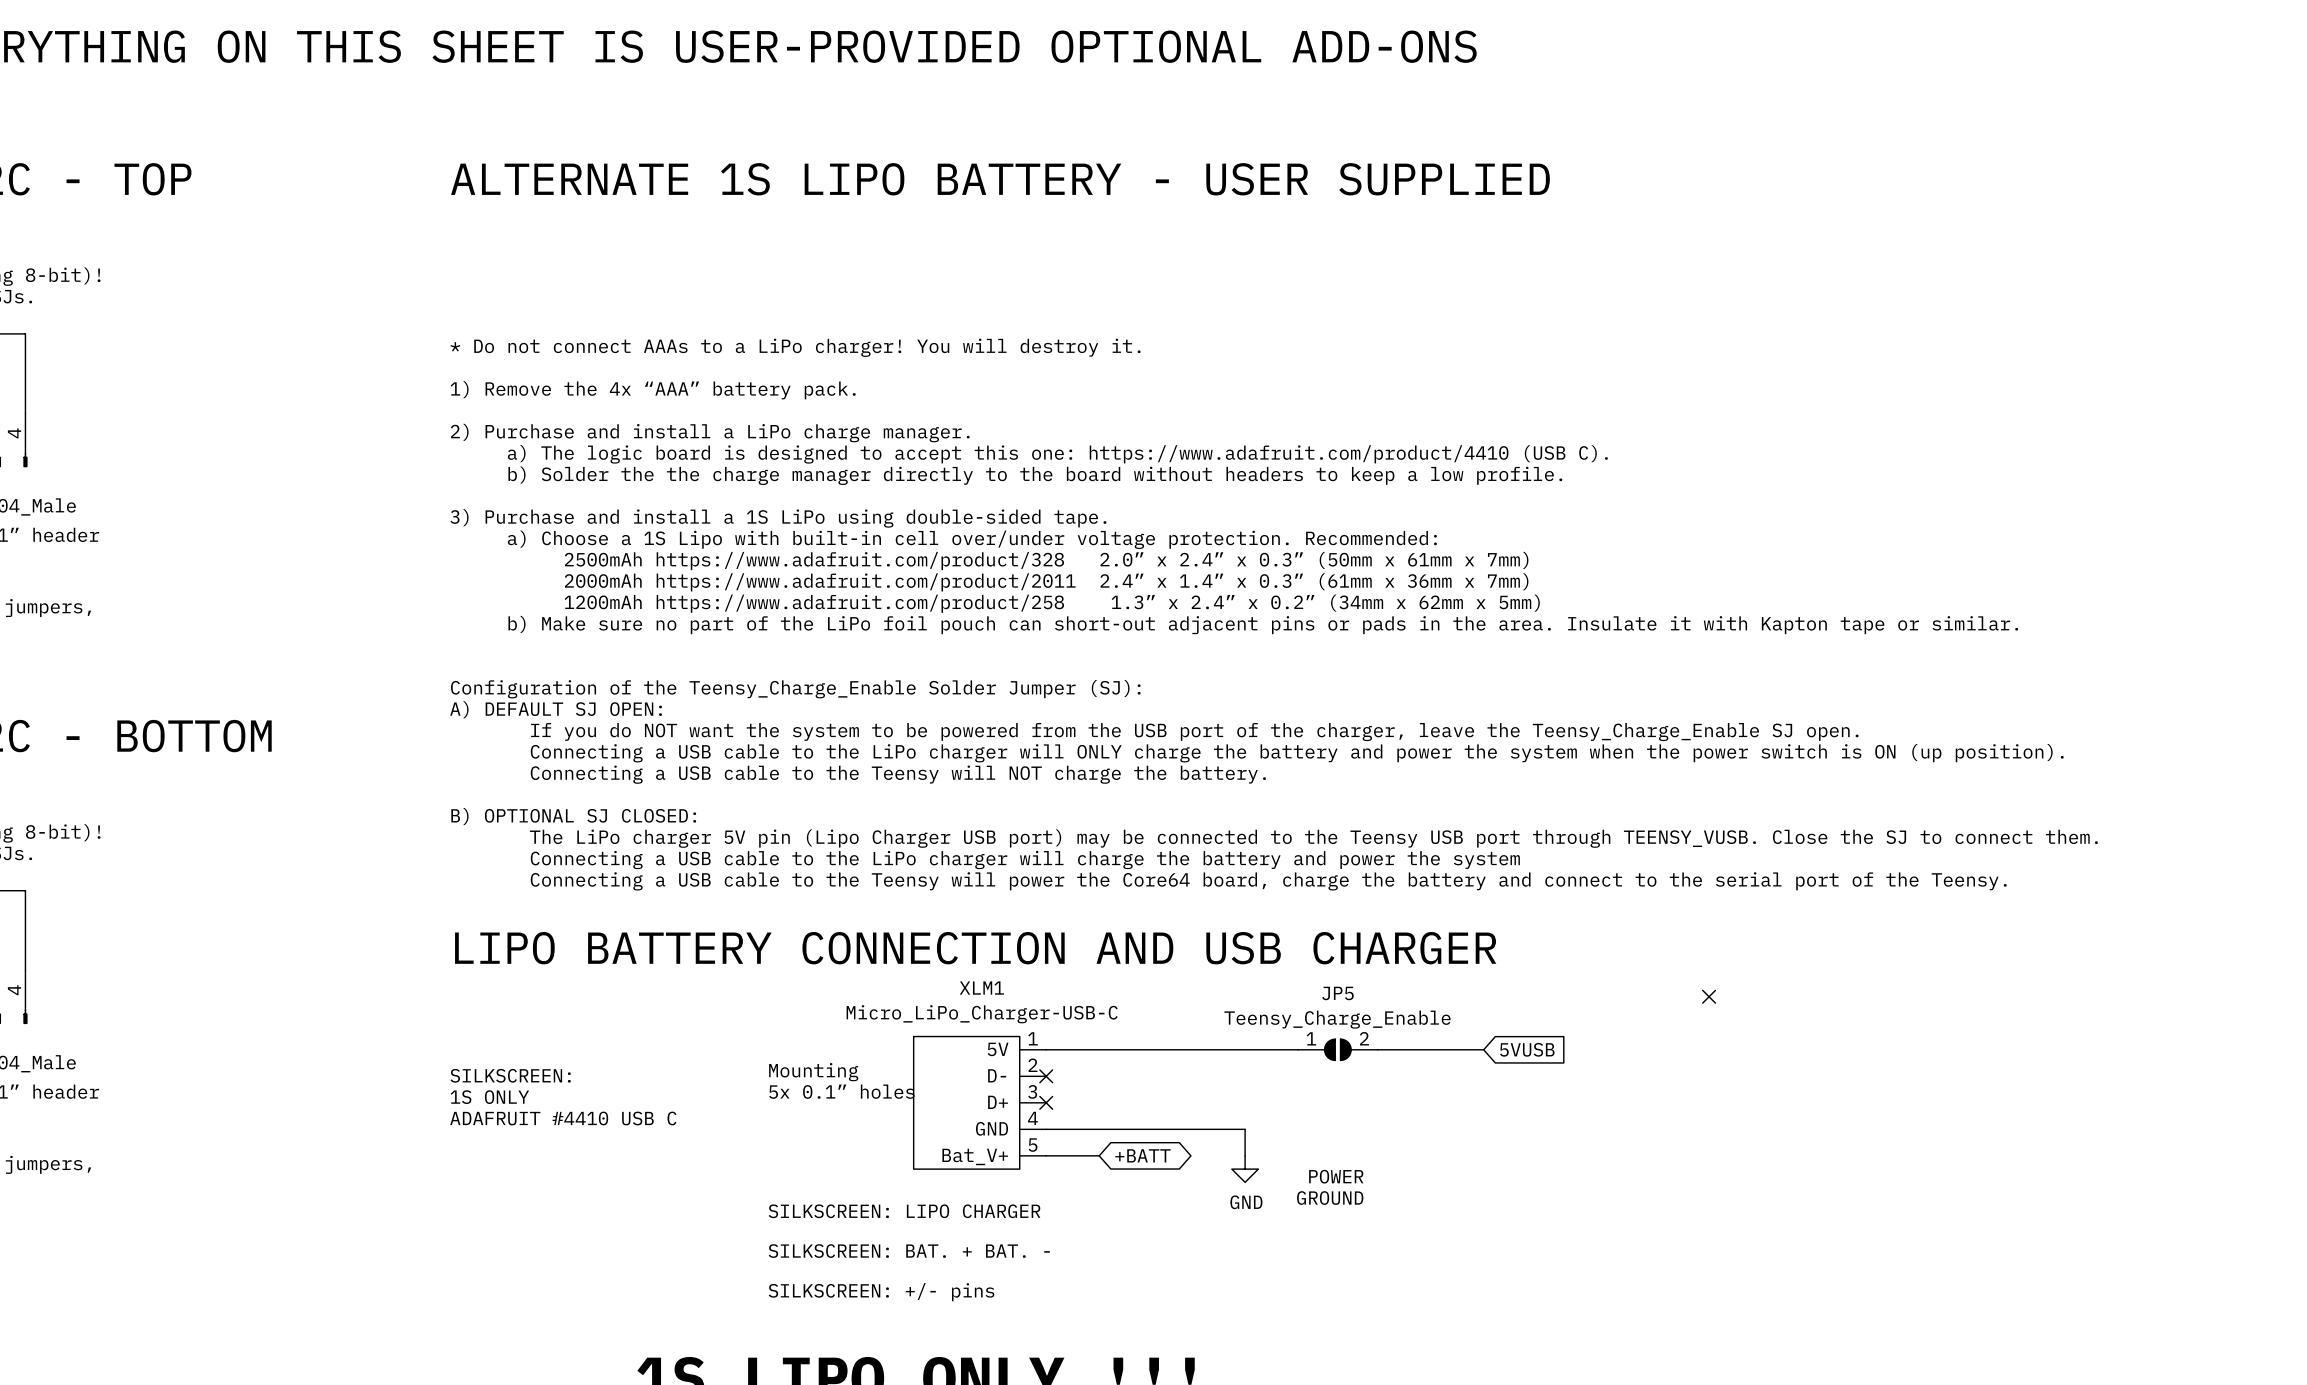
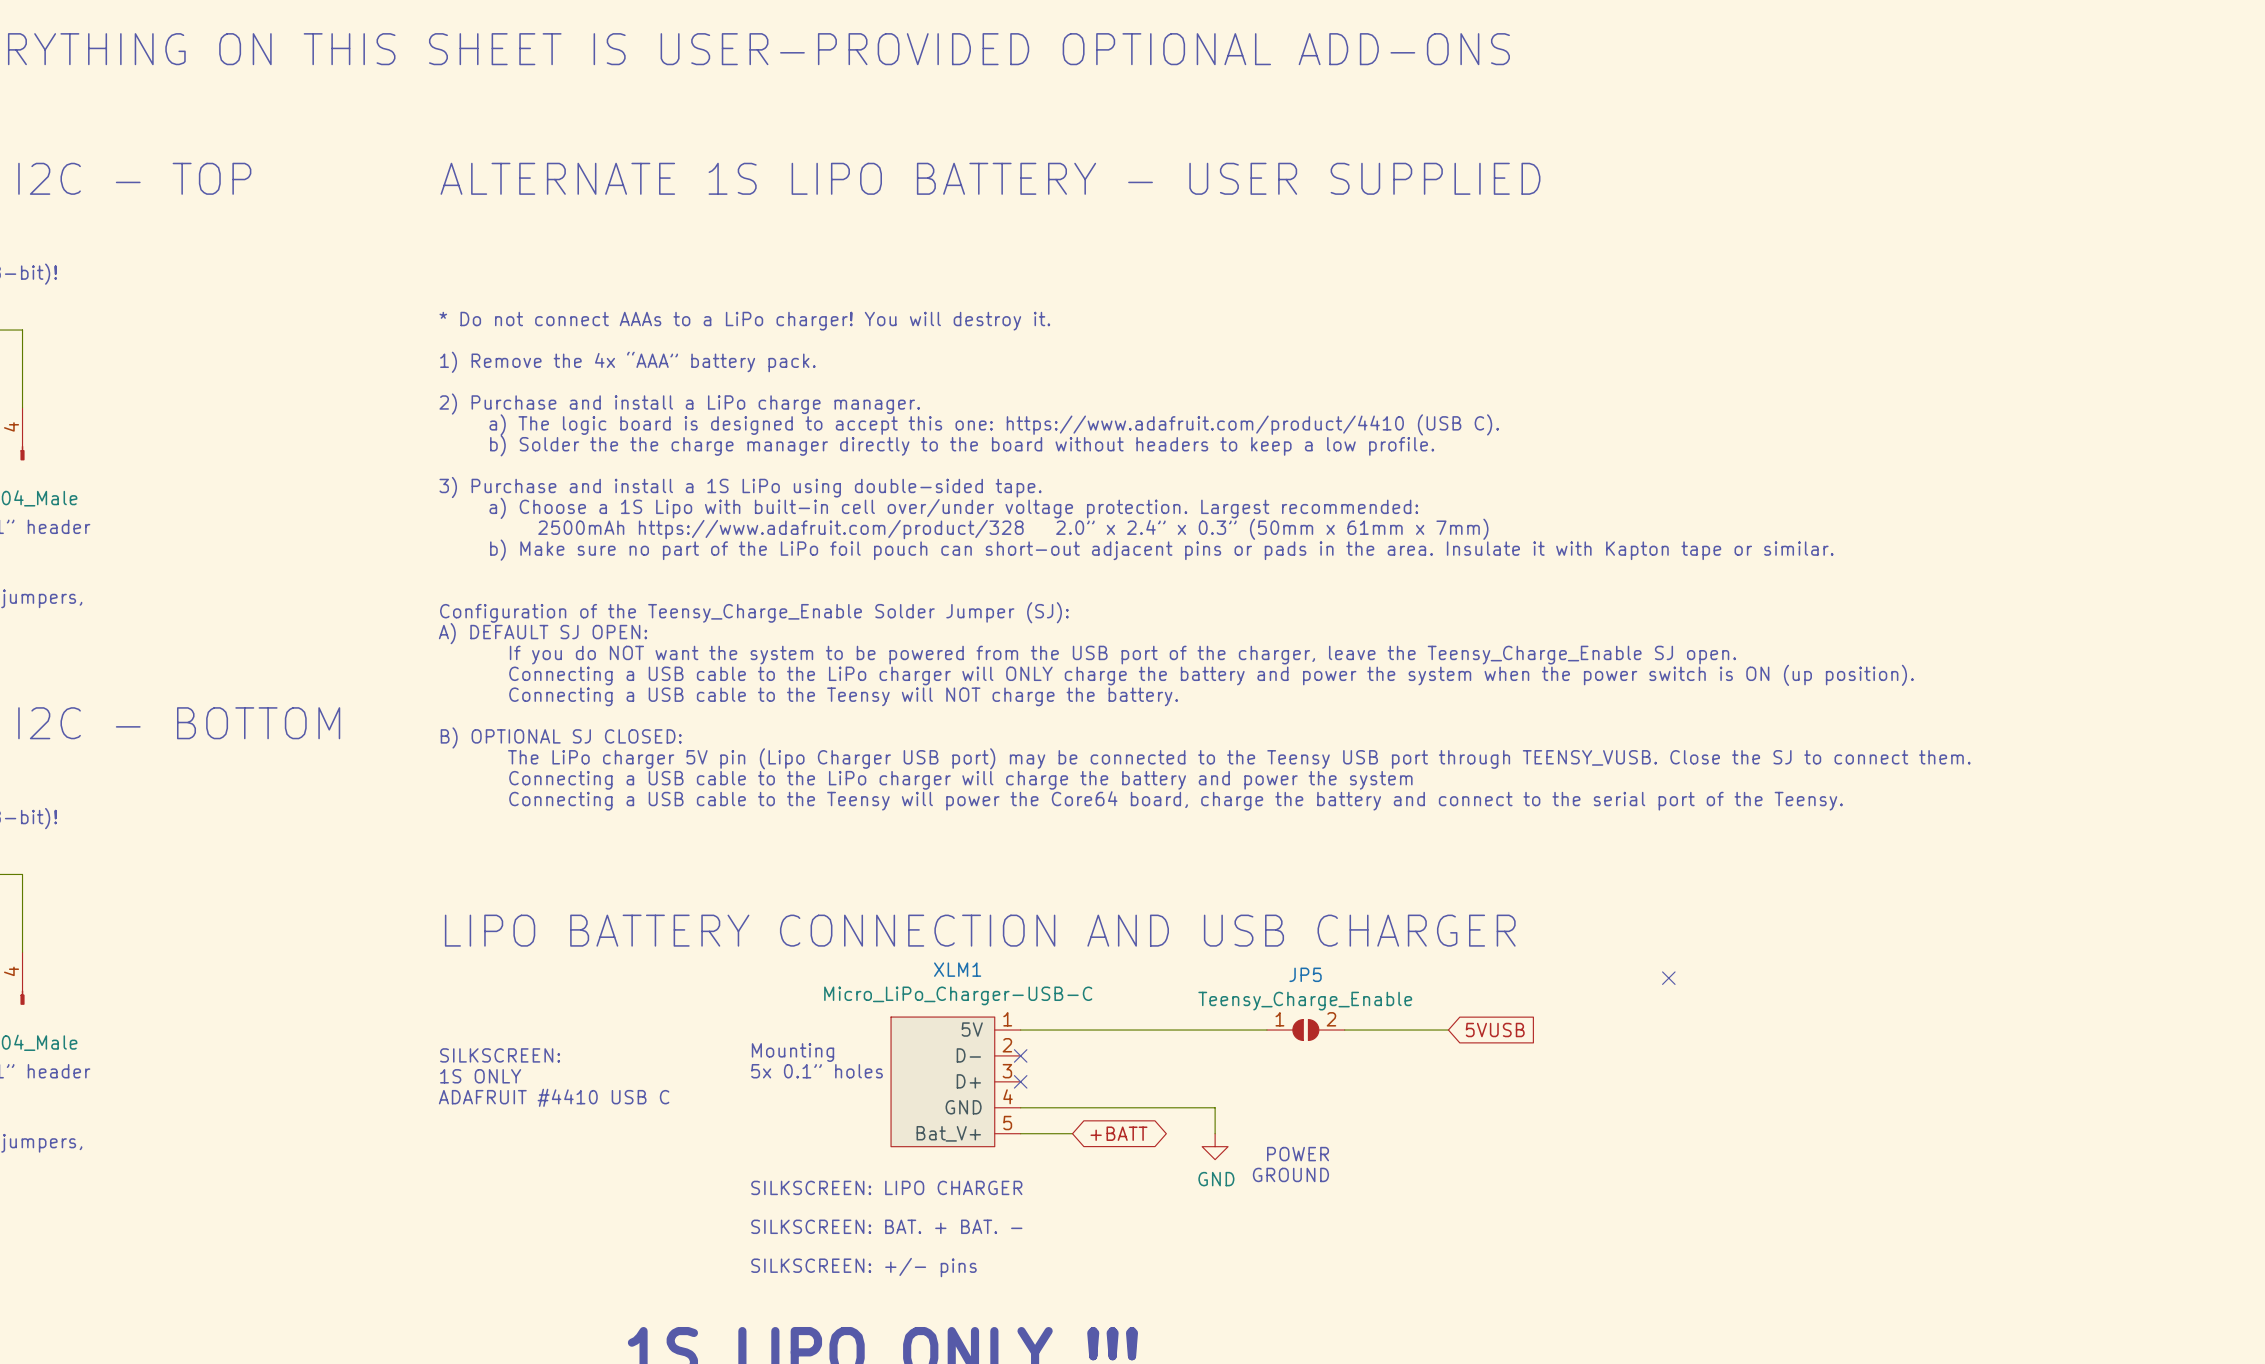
text position: * Do not connect AAAs to a LiPo charger! You will destroy it. (795, 347) -> * Do not connect AAAs to a LiPo charger! You will destroy it. (744, 321)
text position: 1) Remove the 4x “AAA” battery pack. (653, 390) -> 1) Remove the 4x “AAA” battery pack. (627, 362)
text position: 2) Purchase and install a LiPo charge manager. (710, 433) -> 2) Purchase and install a LiPo charge manager. (679, 404)
text position: a) The logic board is designed to accept this one: https://www.adafruit.com/product/4410 (USB C). (1057, 454) -> a) The logic board is designed to accept this one: https://www.adafruit.com/product/4410 (USB C). (994, 424)
text position: b) Solder the the charge manager directly to the board without headers to keep a low profile. (1035, 475) -> b) Solder the the charge manager directly to the board without headers to keep a low profile. (962, 445)
text position: 3) Purchase and install a 1S LiPo using double-sided tape. (778, 518) -> 3) Purchase and install a 1S LiPo using double-sided tape. (740, 487)
text: a) Choose a 1S Lipo with built-in cell over/under voltage protection. Recommended: (972, 539) -> a) Choose a 1S Lipo with built-in cell over/under voltage protection. Largest recommended: (953, 508)
text position: 2500mAh https://www.adafruit.com/product/328 2.0” x 2.4” x 0.3” (50mm x 61mm x 7mm) (1046, 561) -> 2500mAh https://www.adafruit.com/product/328 2.0” x 2.4” x 0.3” (50mm x 61mm x 7mm) (1013, 529)
text: 2000mAh https://www.adafruit.com/product/2011 2.4” x 1.4” x 0.3” (61mm x 36mm x 7mm) (1046, 582) -> none
text: 1200mAh https://www.adafruit.com/product/258 1.3” x 2.4” x 0.2” (34mm x 62mm x 5mm) (1052, 603) -> none
text position: b) Make sure no part of the LiPo foil pouch can short-out adjacent pins or pads in the area. Insulate it with Kapton tape or similar. (1263, 625) -> b) Make sure no part of the LiPo foil pouch can short-out adjacent pins or pads in the area. Insulate it with Kapton tape or similar. (1161, 550)
text position: Configuration of the Teensy_Charge_Enable Solder Jumper (SJ): (795, 689) -> Configuration of the Teensy_Charge_Enable Solder Jumper (SJ): (754, 612)
text position: A) DEFAULT SJ OPEN: (556, 709) -> A) DEFAULT SJ OPEN: (542, 633)
text position: If you do NOT want the system to be powered from the USB port of the charger, leave the Teensy_Charge_Enable SJ open. (1194, 732) -> If you do NOT want the system to be powered from the USB port of the charger, leave the Teensy_Charge_Enable SJ open. (1122, 655)
text position: Connecting a USB cable to the LiPo charger will ONLY charge the battery and power the system when the power switch is ON (up position). (1297, 753) -> Connecting a USB cable to the LiPo charger will ONLY charge the battery and power the system when the power switch is ON (up position). (1211, 675)
text position: Connecting a USB cable to the Teensy will NOT charge the battery. (898, 774) -> Connecting a USB cable to the Teensy will NOT charge the battery. (843, 696)
text position: B) OPTIONAL SJ CLOSED: (573, 816) -> B) OPTIONAL SJ CLOSED: (561, 737)
text position: The LiPo charger 5V pin (Lipo Charger USB port) may be connected to the Teensy USB port through TEENSY_VUSB. Close the SJ to connect them. (1313, 838) -> The LiPo charger 5V pin (Lipo Charger USB port) may be connected to the Teensy USB port through TEENSY_VUSB. Close the SJ to connect them. (1239, 758)
text position: Connecting a USB cable to the LiPo charger will charge the battery and power the system (1025, 860) -> Connecting a USB cable to the LiPo charger will charge the battery and power the system (960, 780)
text position: Connecting a USB cable to the Teensy will power the Core64 board, charge the battery and connect to the serial port of the Teensy. (1268, 881) -> Connecting a USB cable to the Teensy will power the Core64 board, charge the battery and connect to the serial port of the Teensy. (1176, 800)

